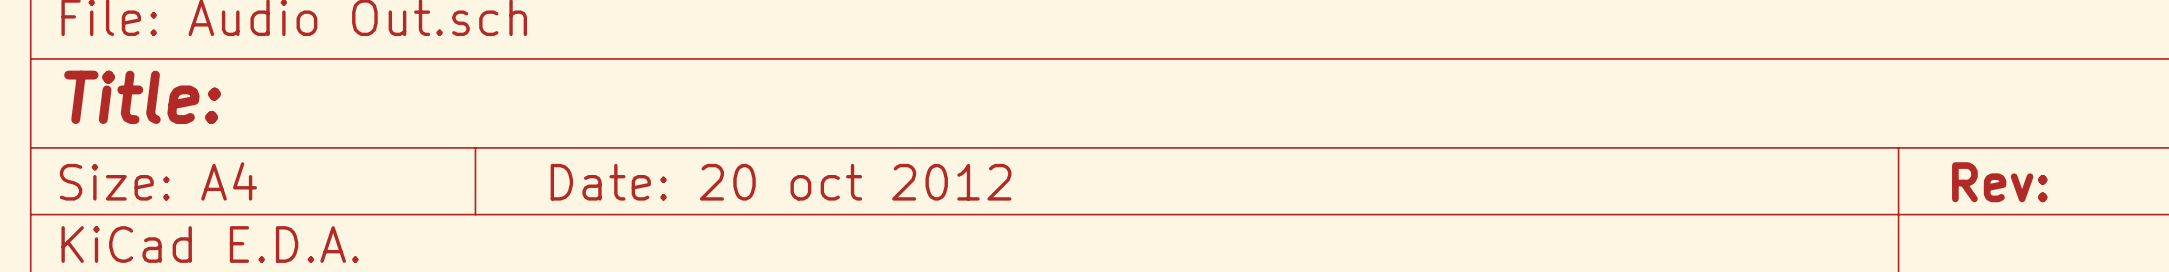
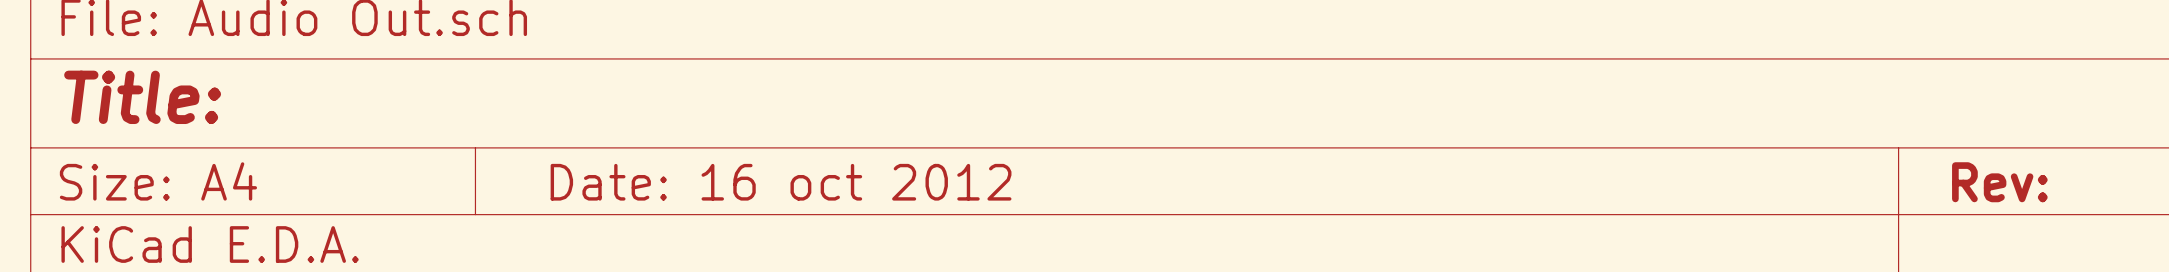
title block: Date: 20 oct 2012 (781, 182) -> Date: 16 oct 2012 (781, 182)

